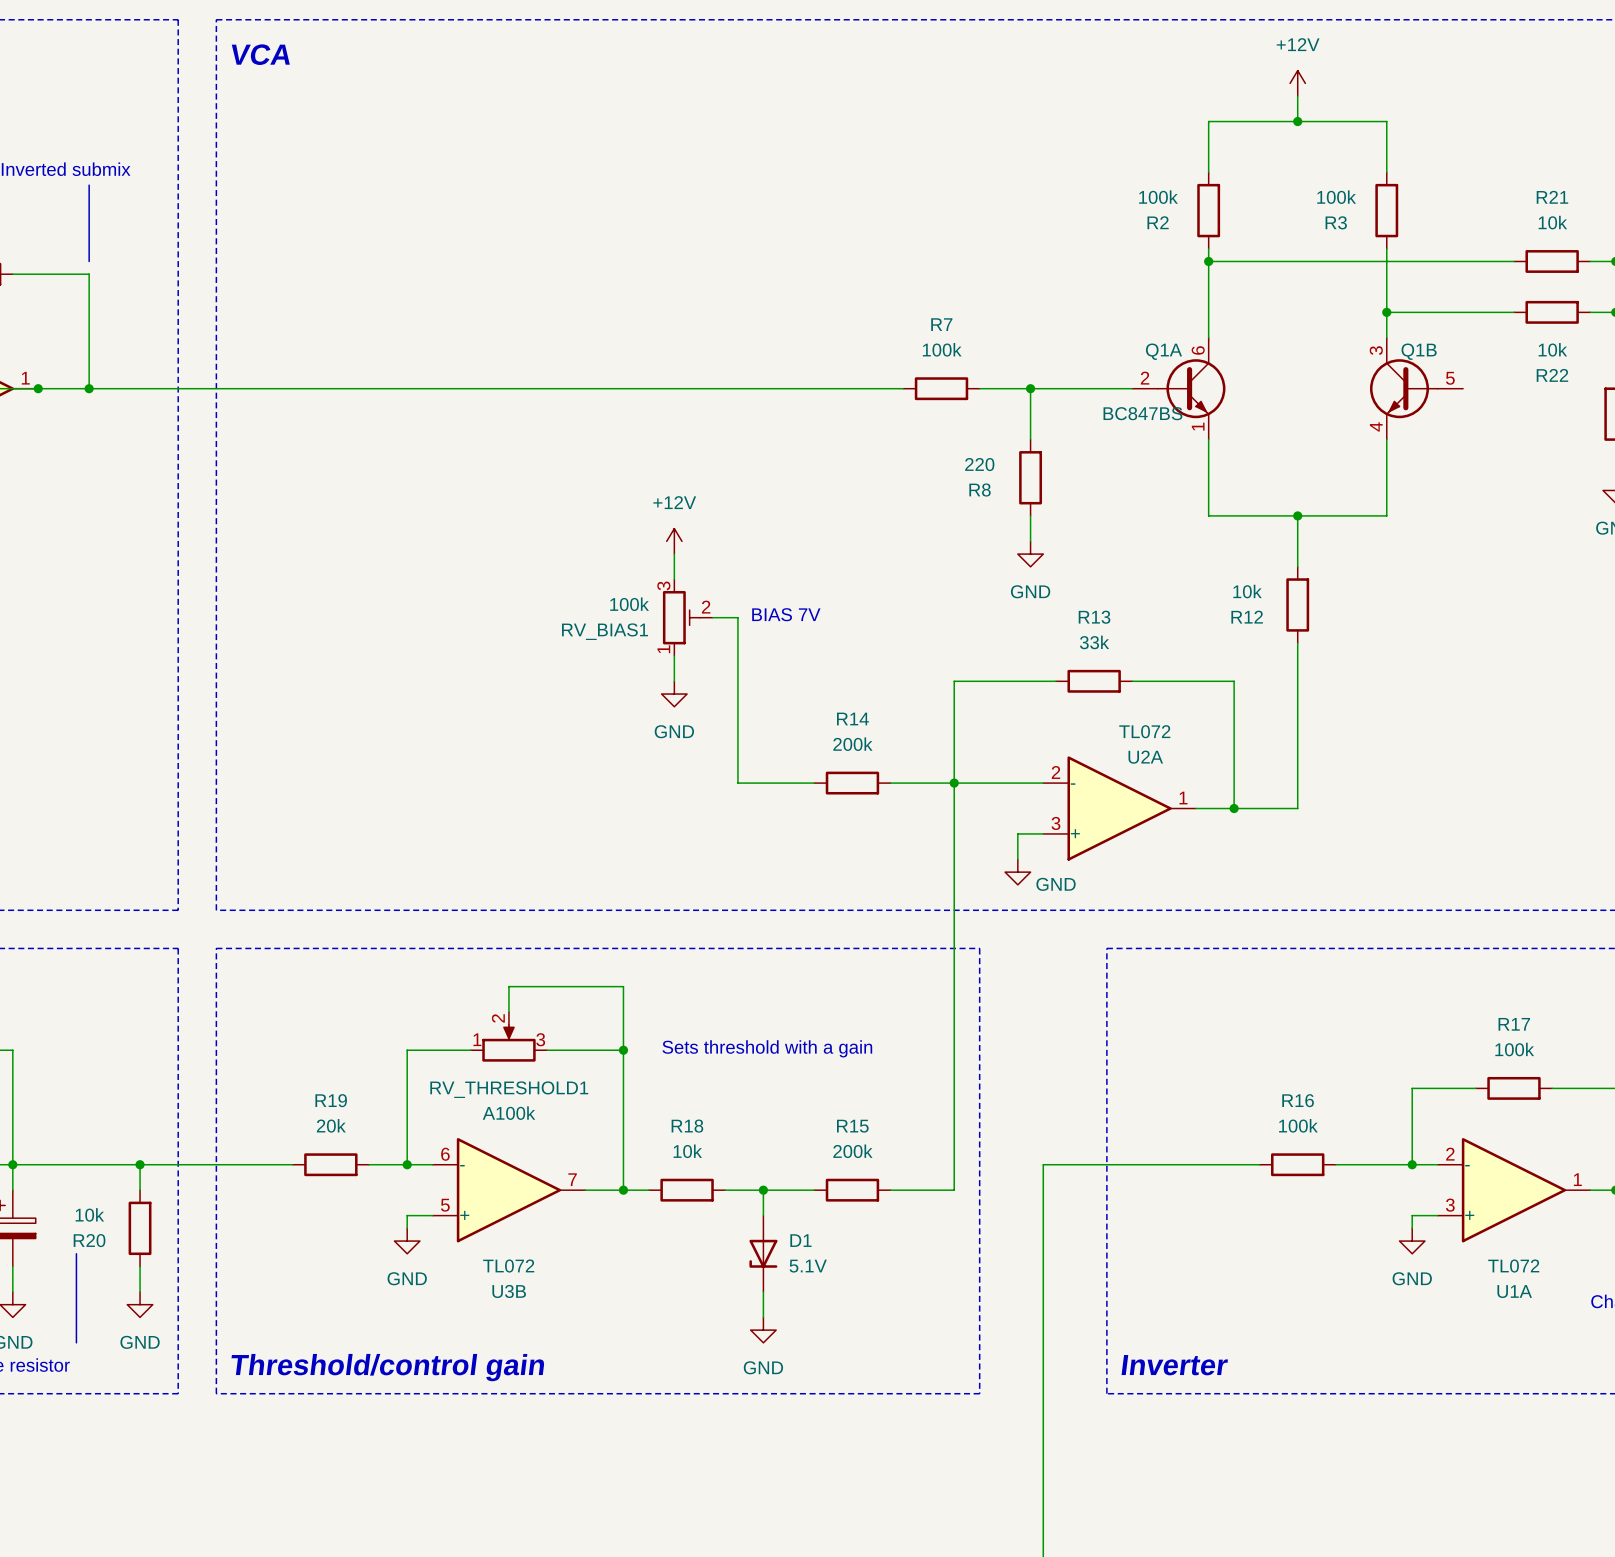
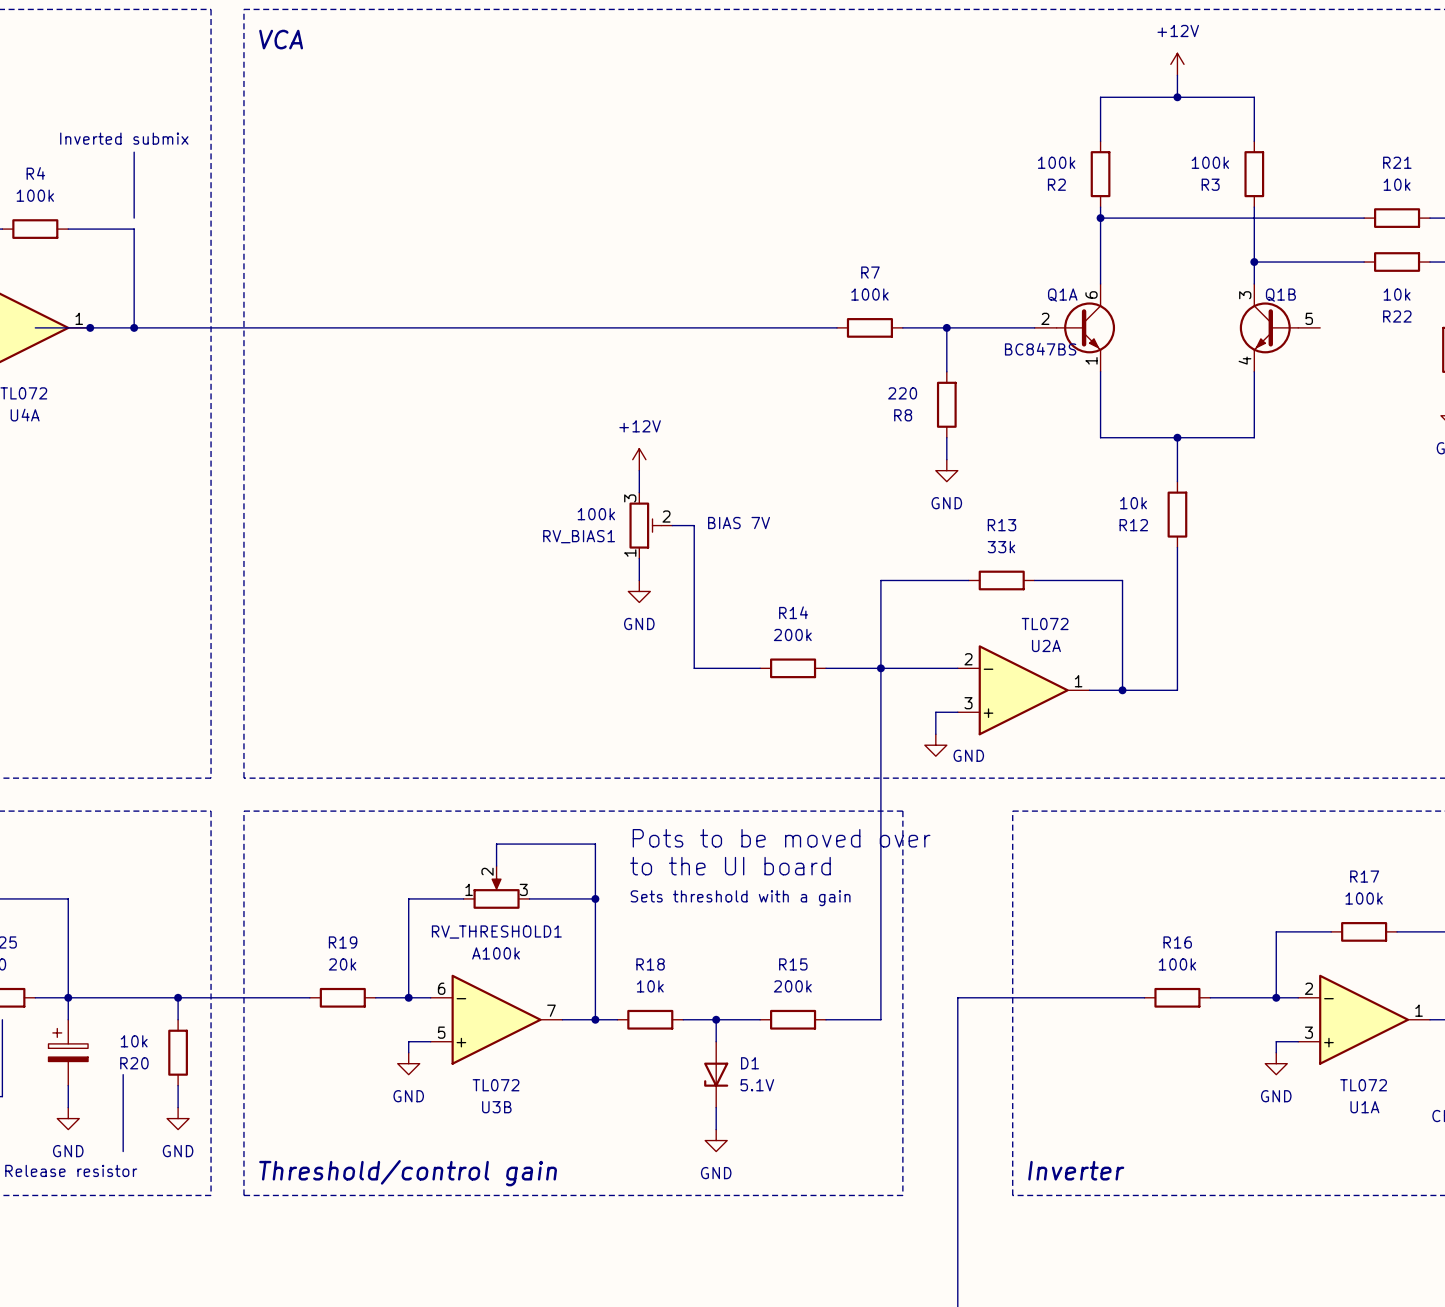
text: none -> Pots to be moved over (781, 838)
text: none -> to the UI board (730, 866)

